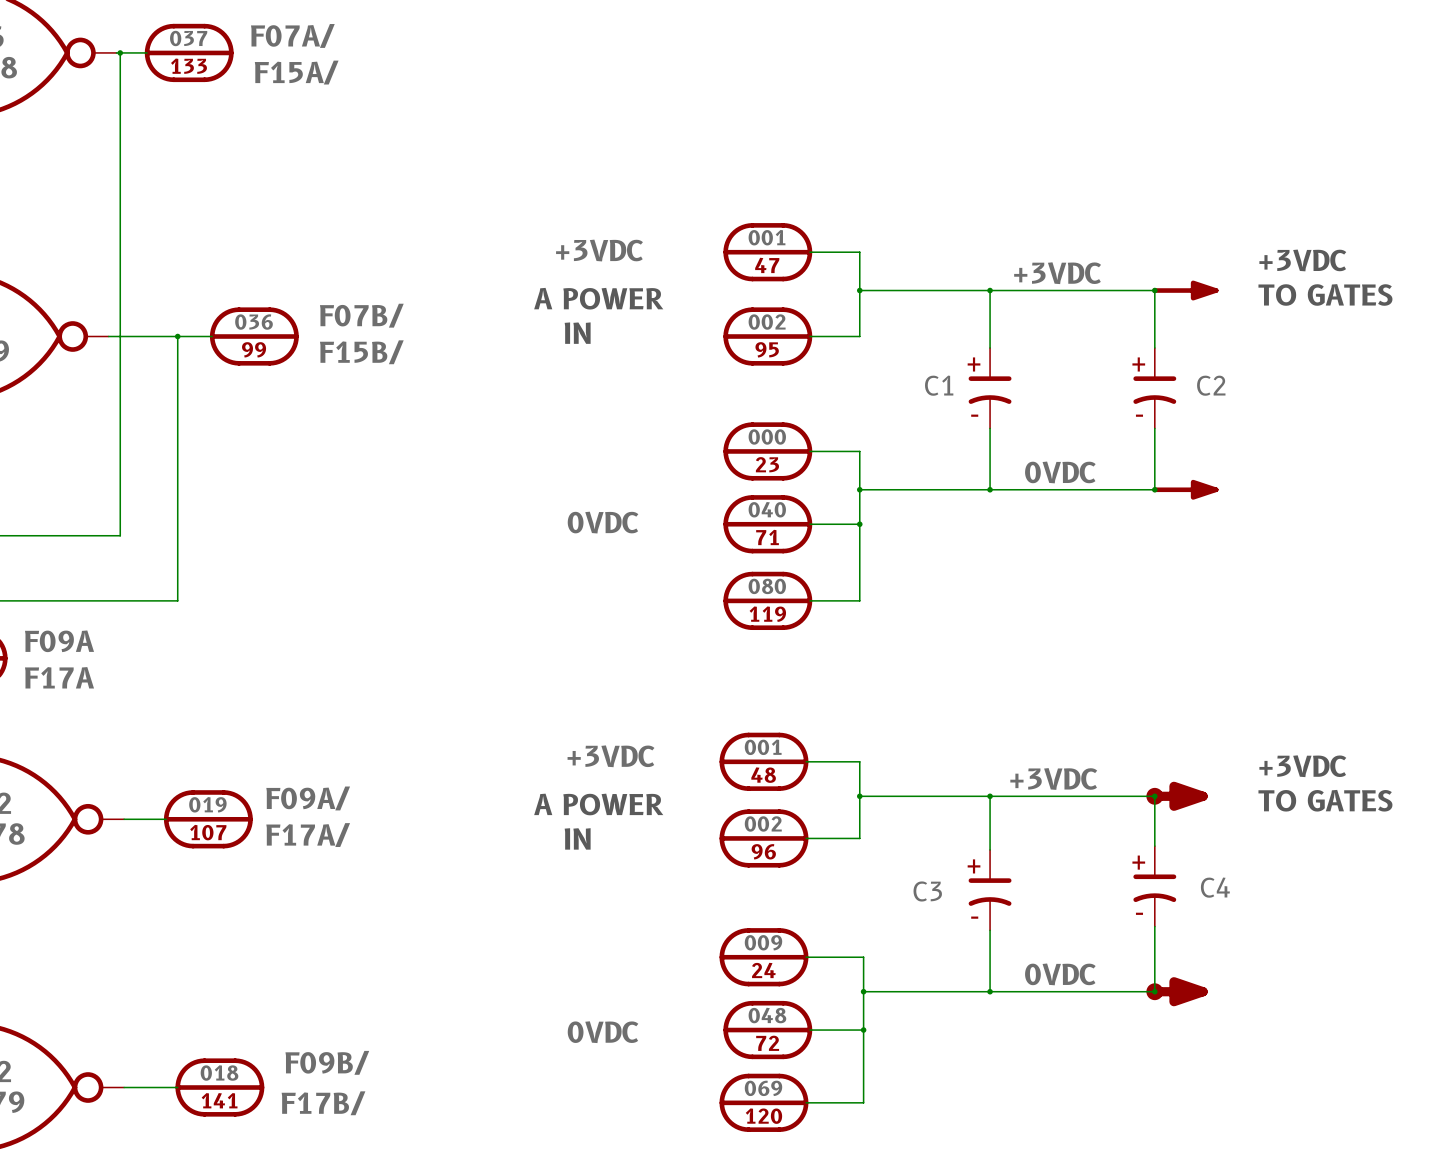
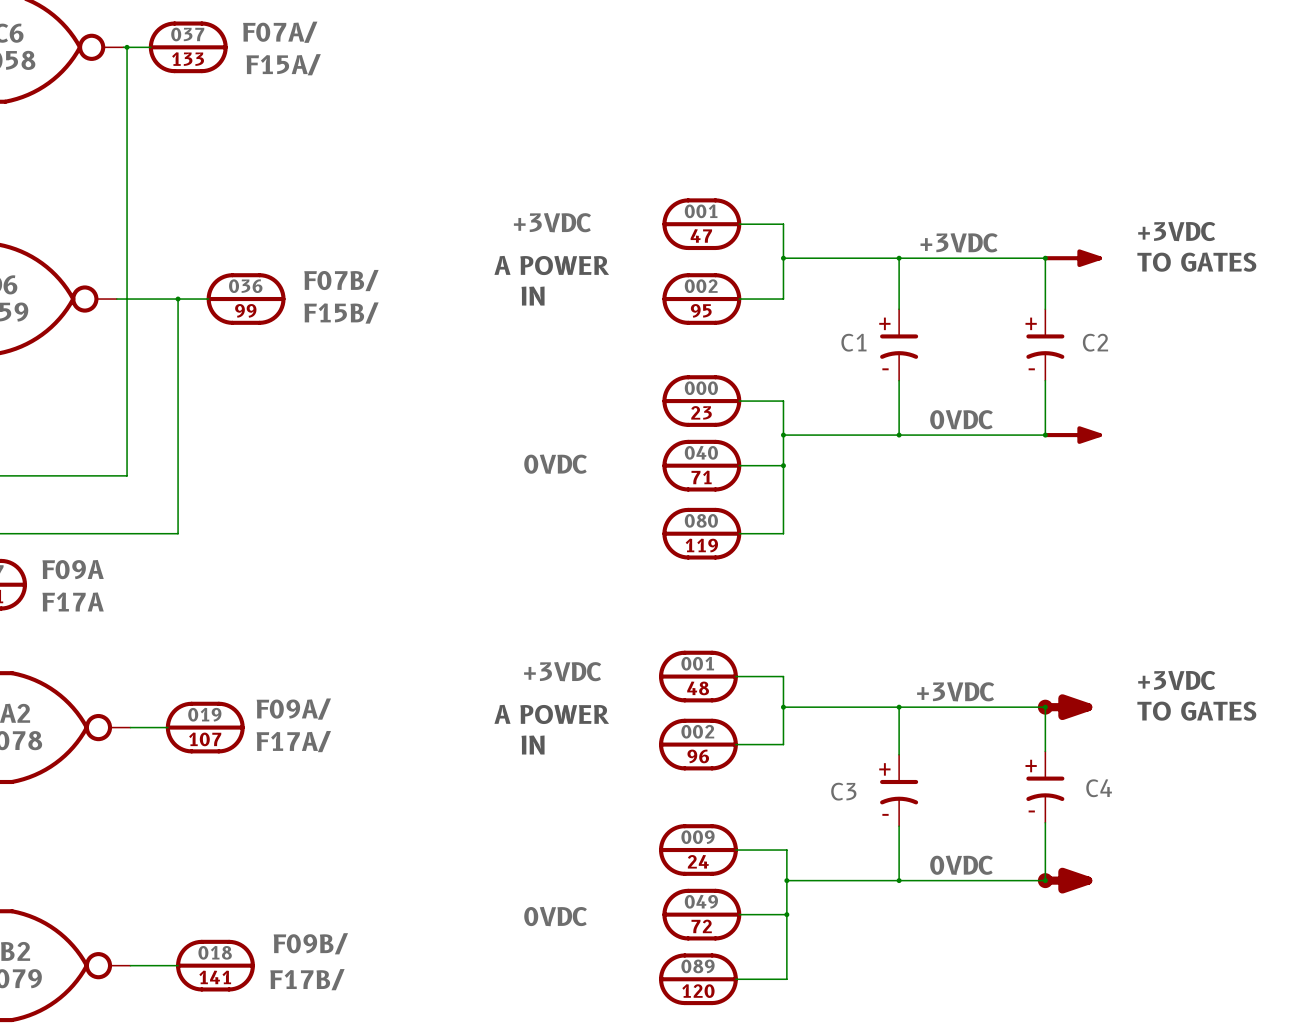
part text: 048 (767, 1015) -> 049 (701, 901)
part text: 069 (763, 1088) -> 089 (698, 966)

